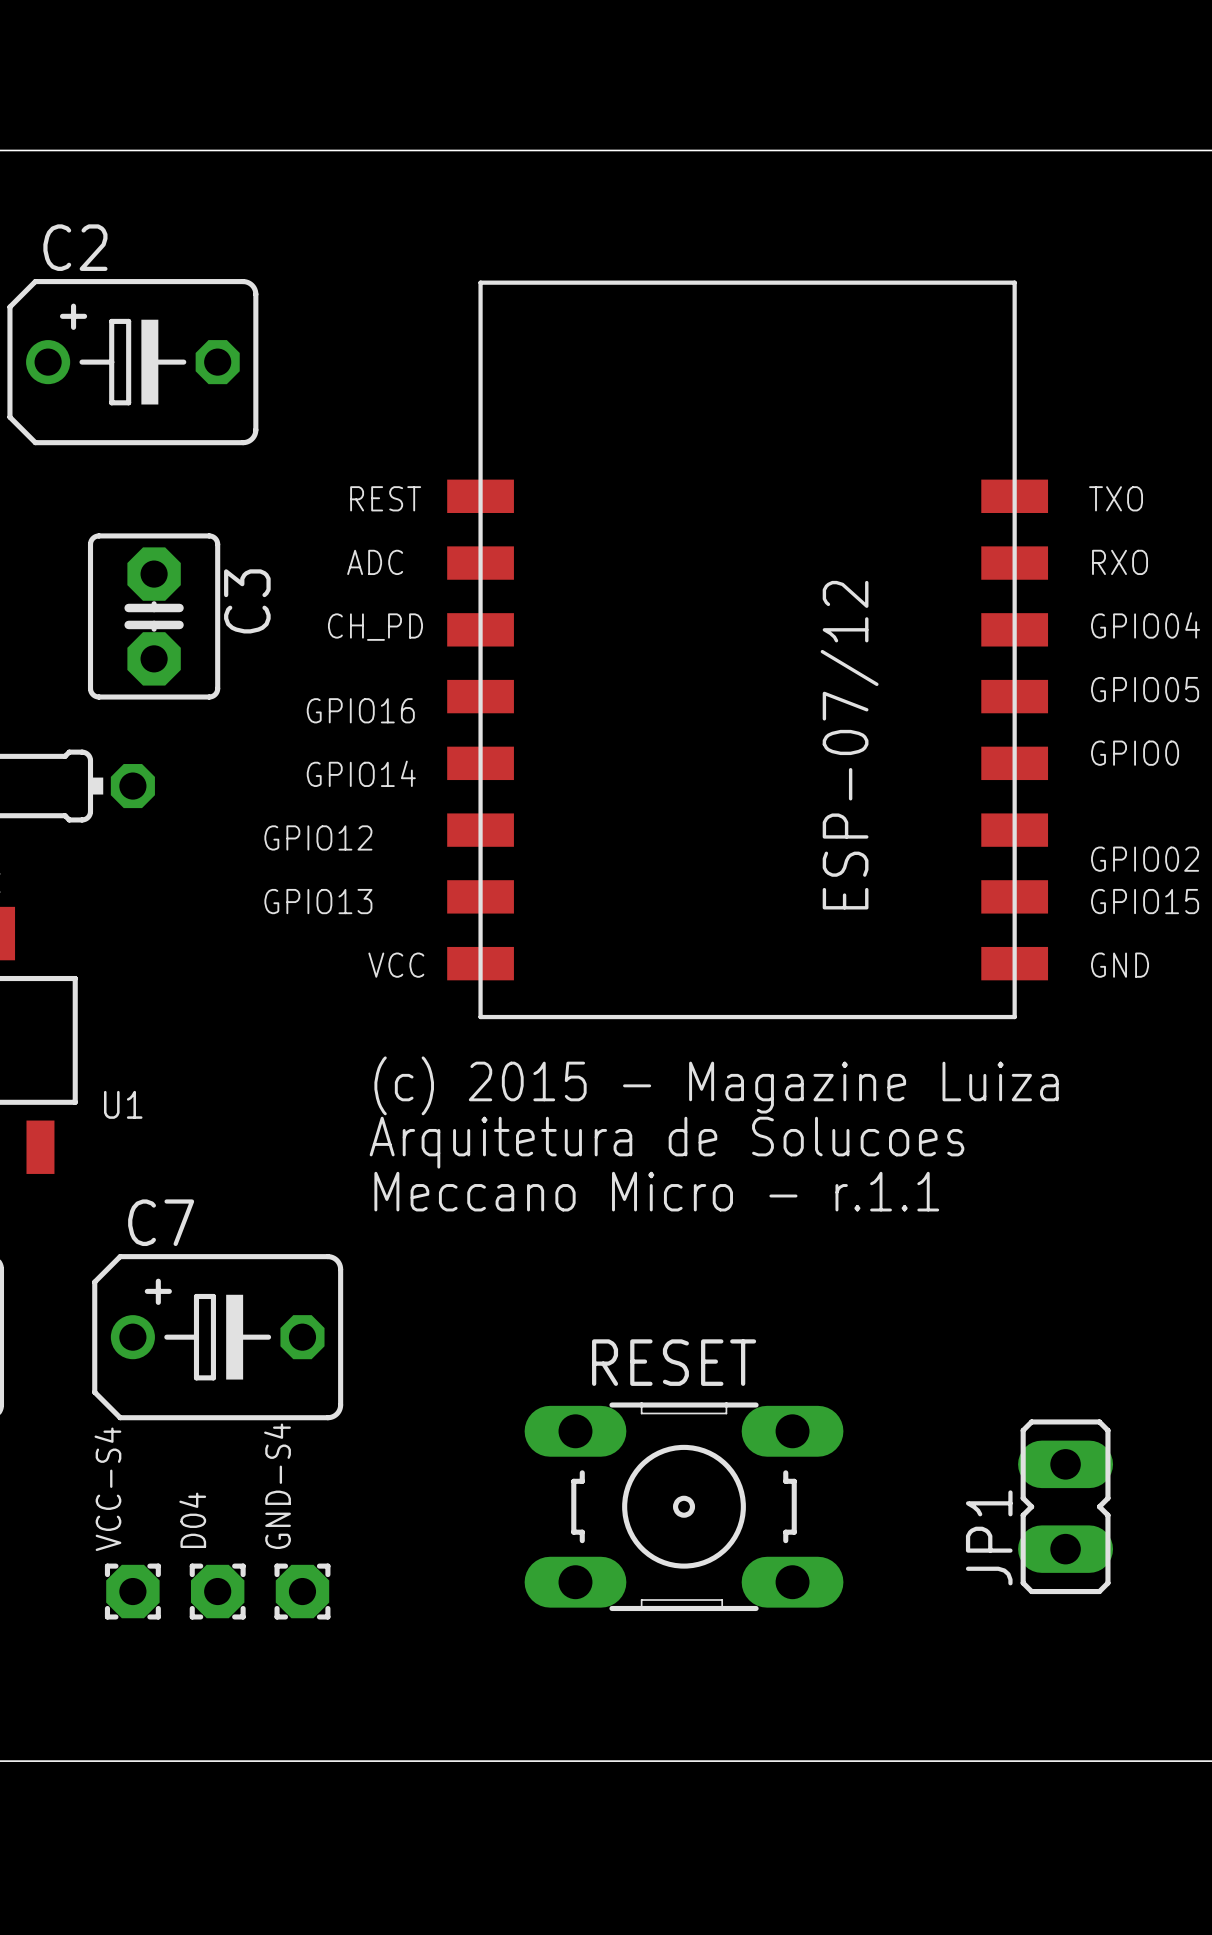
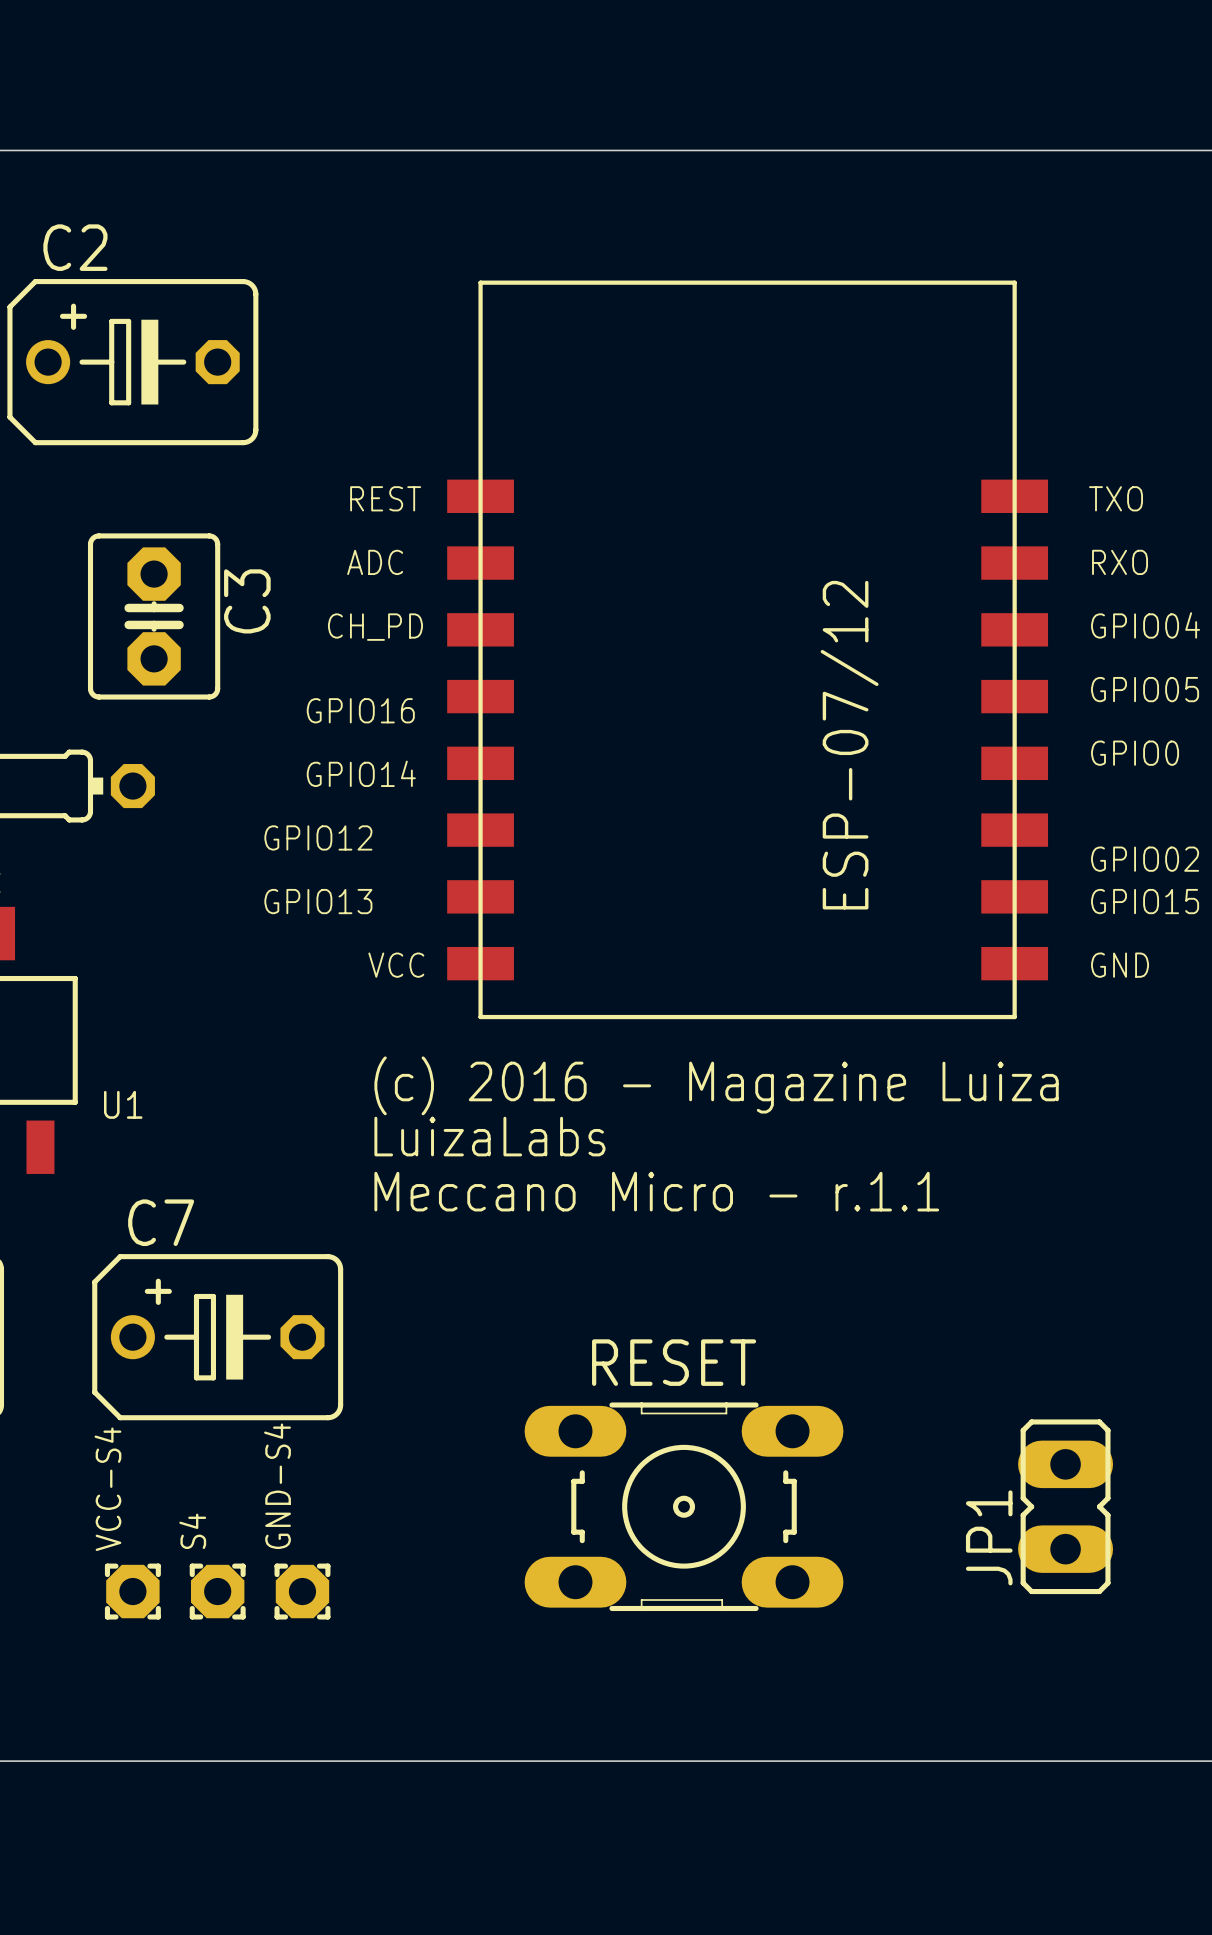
text: (c) 2015 - Magazine Luiza (716, 1085) -> (c) 2016 - Magazine Luiza (716, 1085)
text: Arquitetura de Solucoes (666, 1142) -> LuizaLabs (489, 1136)
D04 name: D04 (192, 1520) -> S4 (192, 1531)

